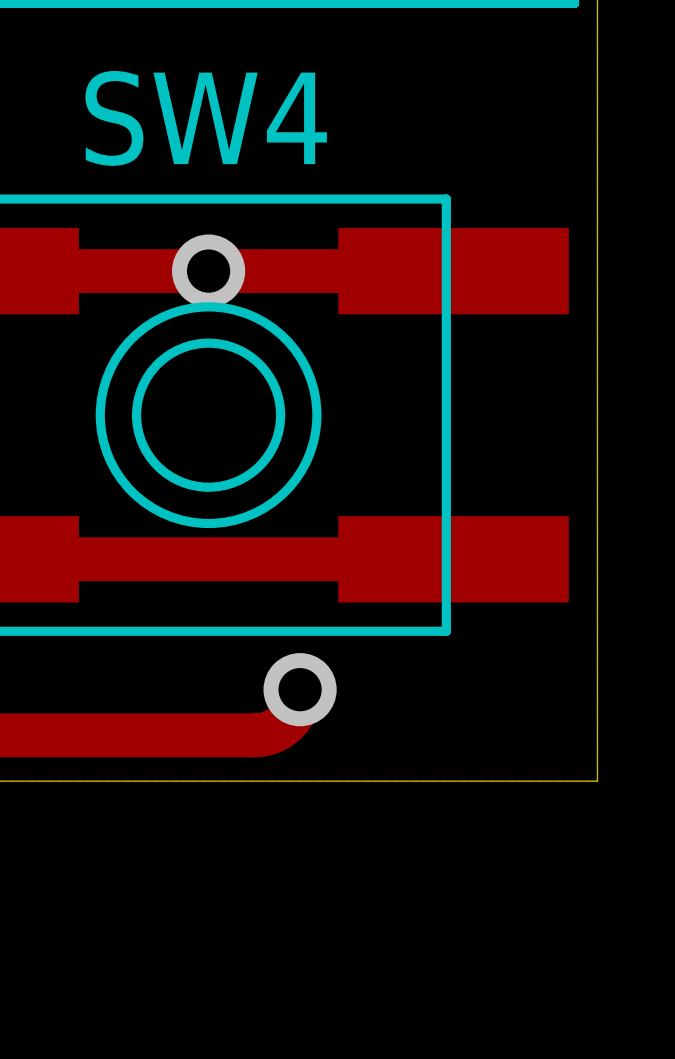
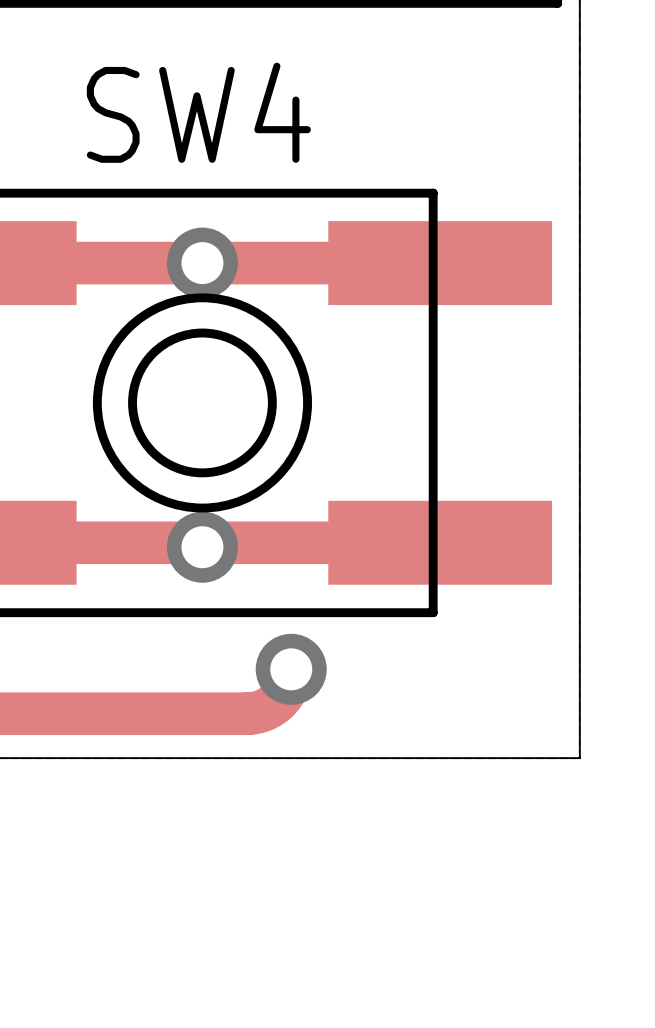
via: none -> (202, 547)

